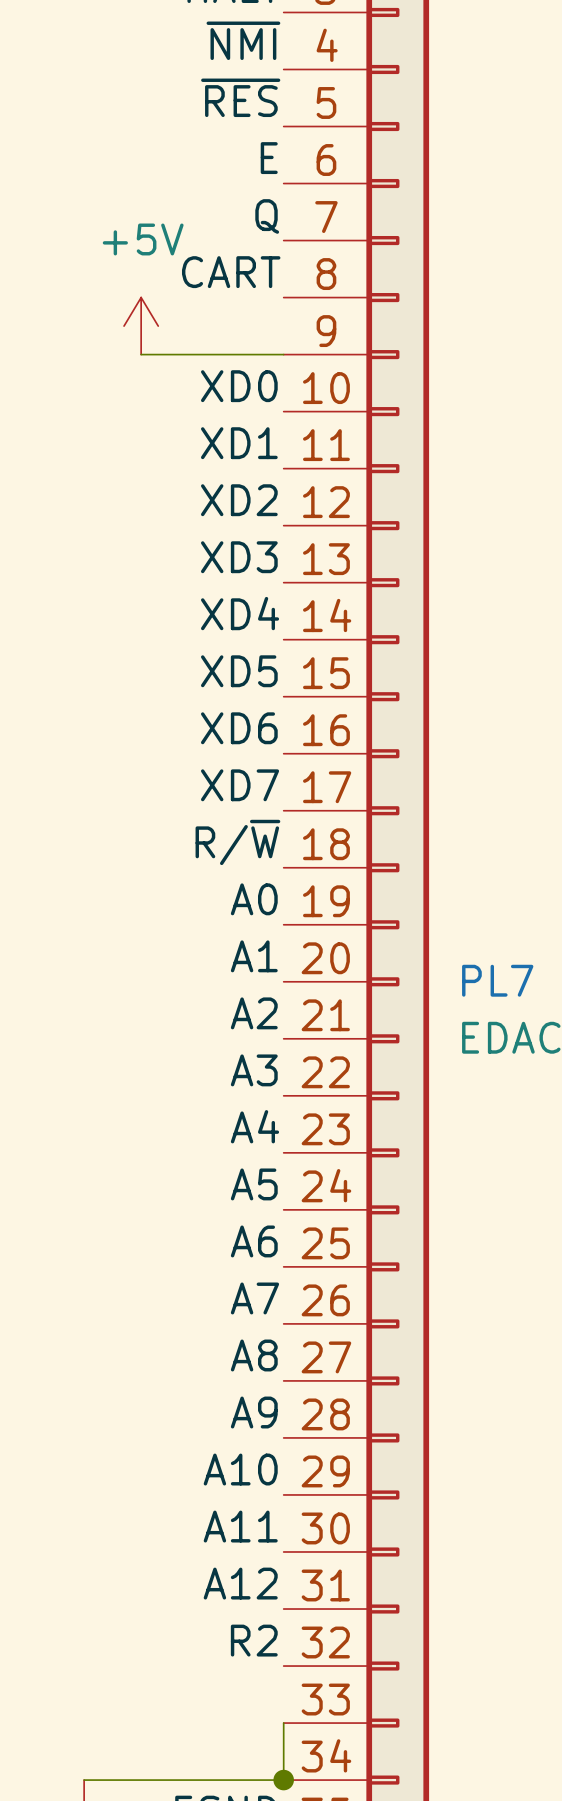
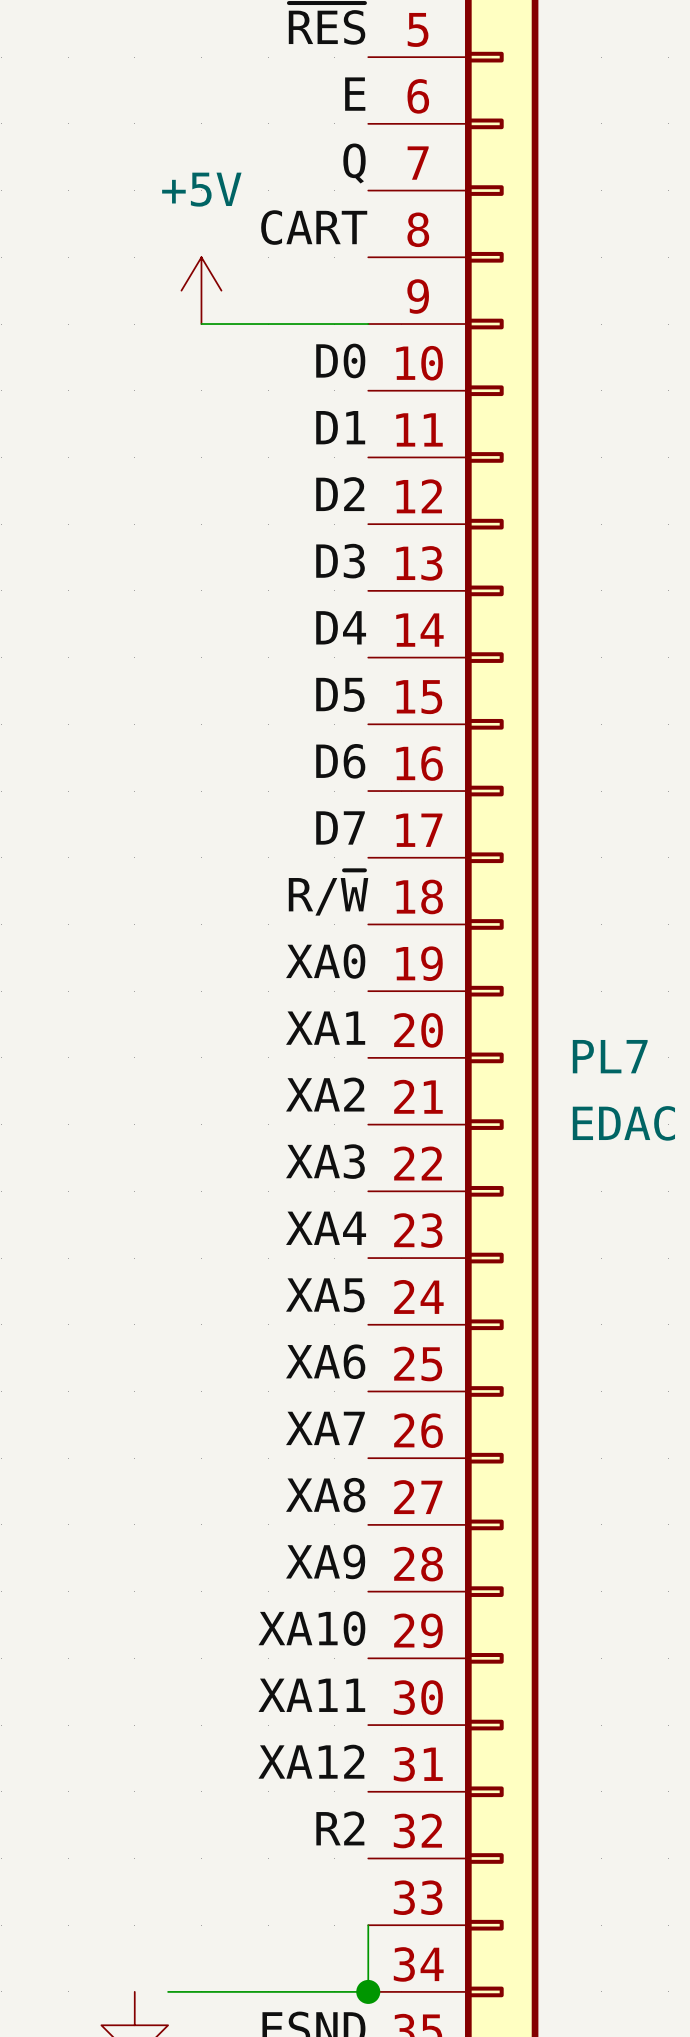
label: XD0 (239, 386) -> D0 (340, 360)
label: XD1 (239, 443) -> D1 (340, 427)
label: XD2 (239, 500) -> D2 (340, 494)
label: XD3 (239, 557) -> D3 (340, 561)
label: XD4 (240, 613) -> D4 (341, 627)
label: XD5 (239, 671) -> D5 (340, 694)
label: XD6 (239, 728) -> D6 (340, 761)
label: XD7 (240, 785) -> D7 (340, 827)
label: A0 (254, 899) -> XA0 (325, 961)
label: A1 (254, 956) -> XA1 (325, 1028)
label: A2 (254, 1013) -> XA2 (325, 1094)
label: A3 (254, 1070) -> XA3 (325, 1161)
label: A4 (254, 1126) -> XA4 (326, 1228)
label: A5 (254, 1184) -> XA5 (325, 1295)
label: A6 (254, 1241) -> XA6 (325, 1361)
label: A7 (254, 1298) -> XA7 (325, 1428)
label: A8 (254, 1355) -> XA8 (325, 1495)
label: A9 (254, 1412) -> XA9 (325, 1561)
label: A10 (240, 1469) -> XA10 (311, 1628)
label: A11 (240, 1526) -> XA11 (311, 1695)
label: A12 (240, 1583) -> XA12 (311, 1761)
wire: (84, 1780) (112, 1780) -> none

